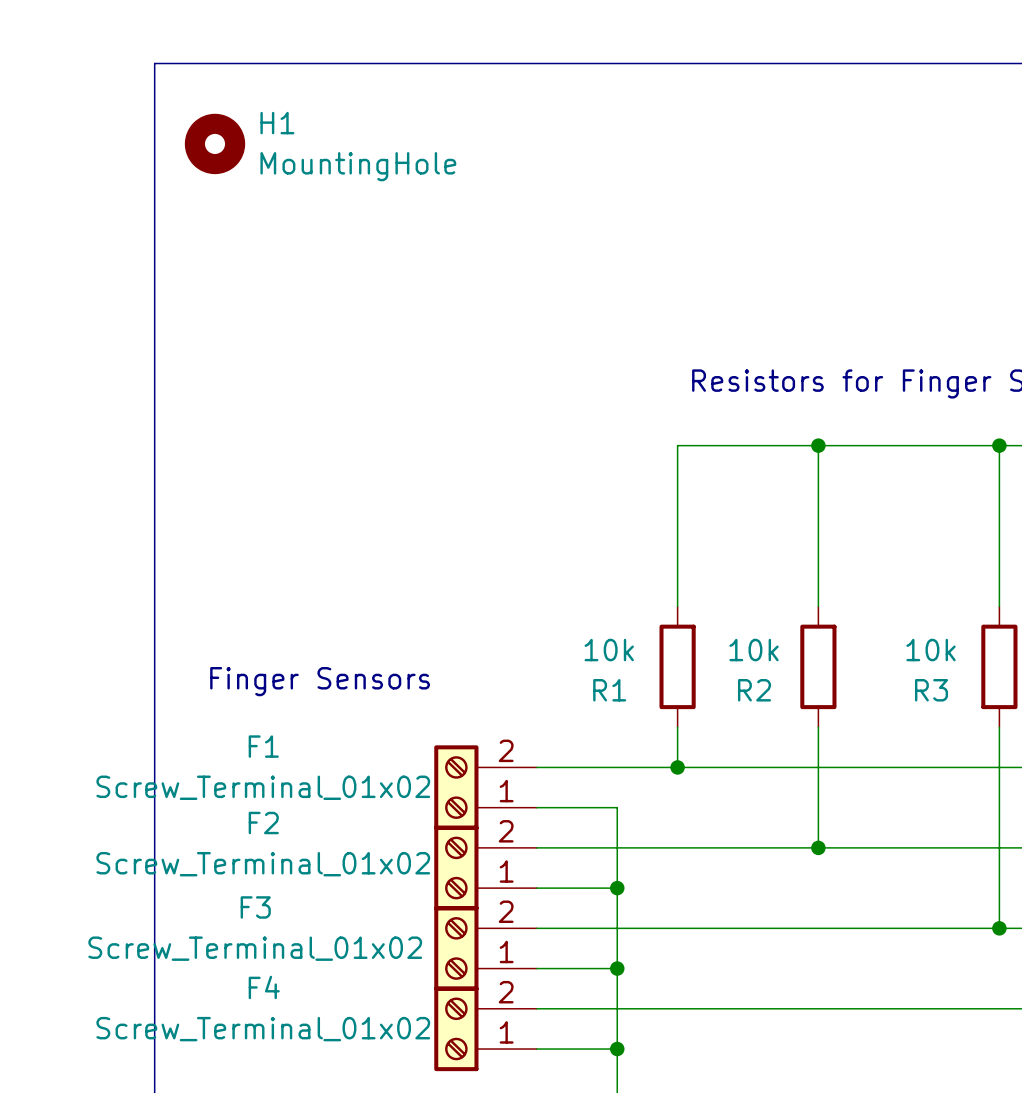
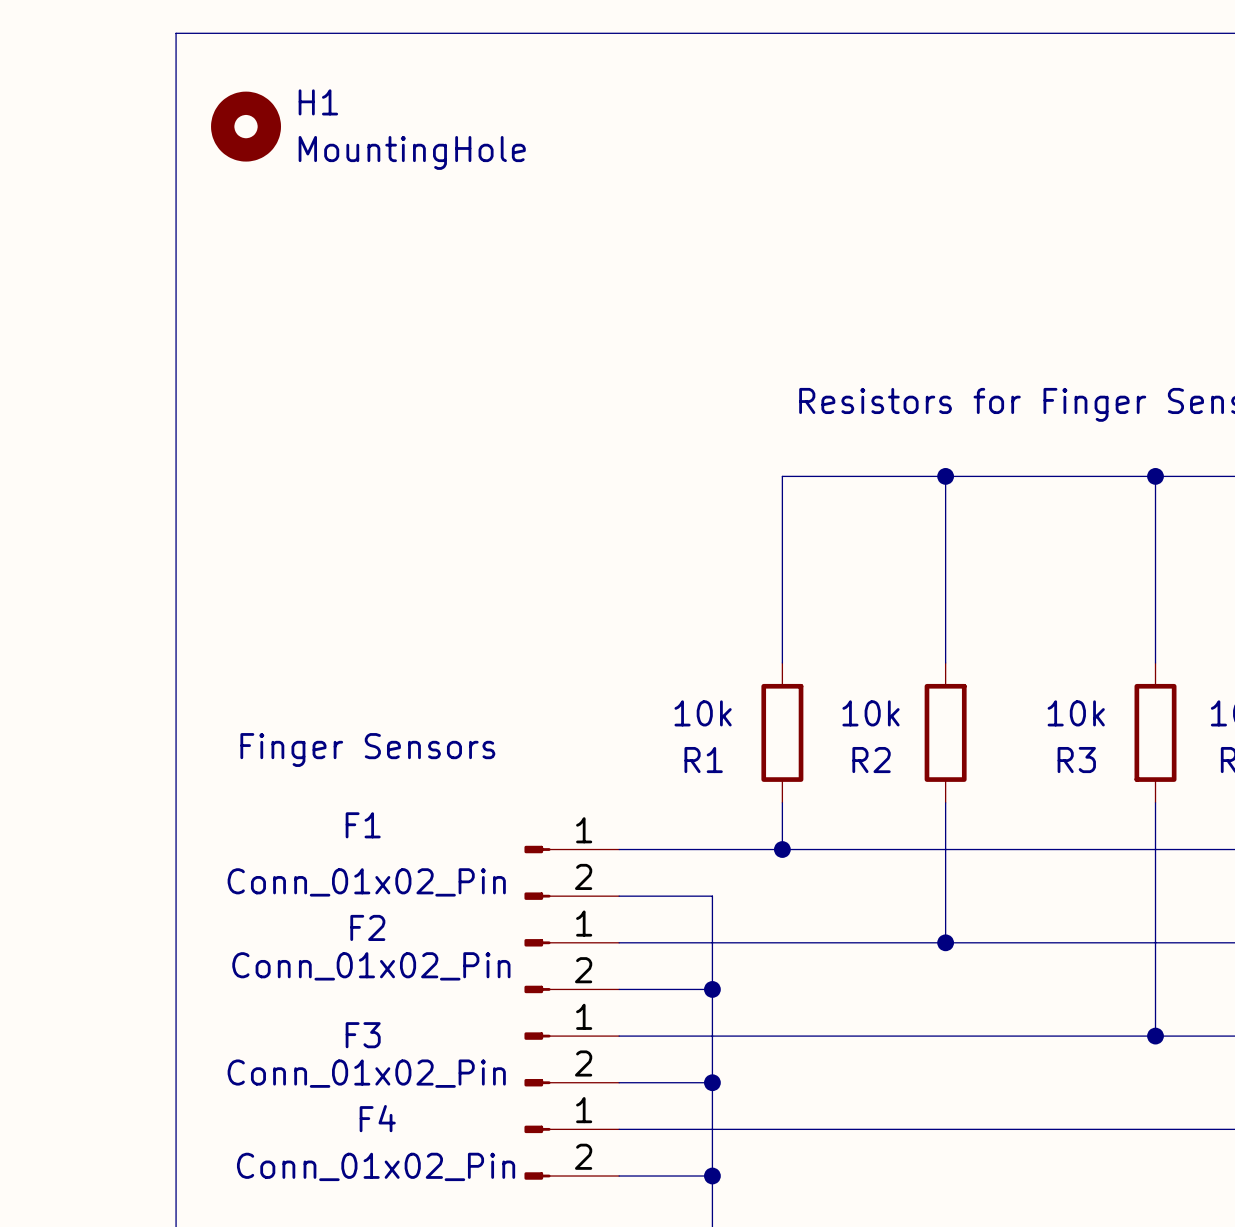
F1 symbol: [434, 745, 537, 830] -> [524, 845, 620, 900]
F1 name position: F1 (263, 746) -> F1 (363, 825)
F1 value: Screw_Terminal_01x02 (263, 787) -> Conn_01x02_Pin (366, 882)
F2 name position: F2 (263, 823) -> F2 (367, 927)
F2 symbol: [434, 825, 537, 911] -> [524, 939, 620, 994]
F2 value: Screw_Terminal_01x02 (263, 864) -> Conn_01x02_Pin (371, 966)
F3 symbol: [434, 906, 537, 991] -> [524, 1032, 620, 1087]
F3 name position: F3 (255, 907) -> F3 (363, 1035)
F3 value: Screw_Terminal_01x02 (255, 948) -> Conn_01x02_Pin (366, 1073)
F4 symbol: [434, 986, 537, 1072] -> [524, 1125, 620, 1180]
F4 name position: F4 (264, 987) -> F4 (377, 1118)
F4 value: Screw_Terminal_01x02 (263, 1029) -> Conn_01x02_Pin (376, 1166)

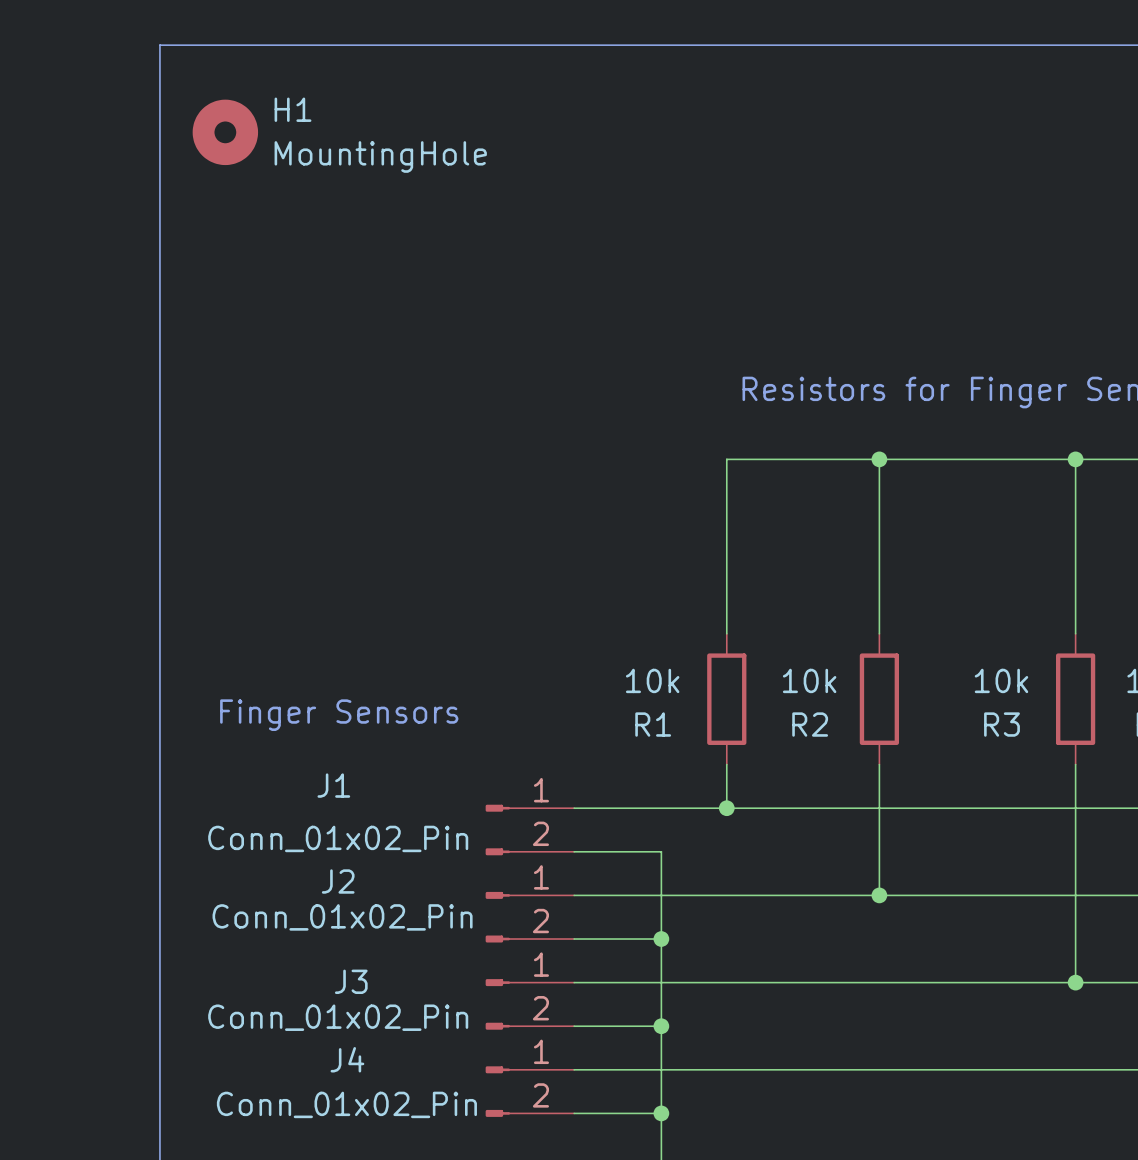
F1 name: F1 (363, 825) -> J1 (333, 785)
F2 name: F2 (367, 927) -> J2 (338, 881)
F3 name: F3 (363, 1035) -> J3 (351, 981)
F4 name: F4 (377, 1118) -> J4 (347, 1059)

